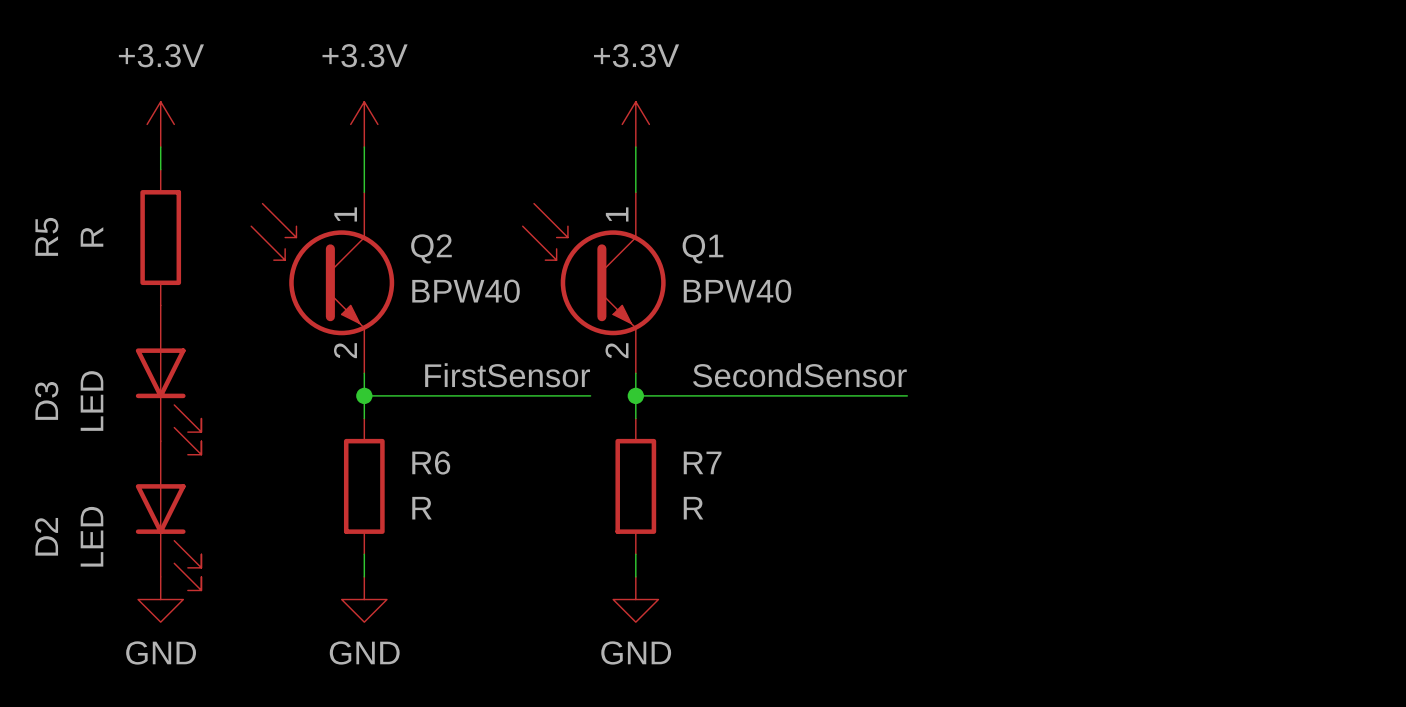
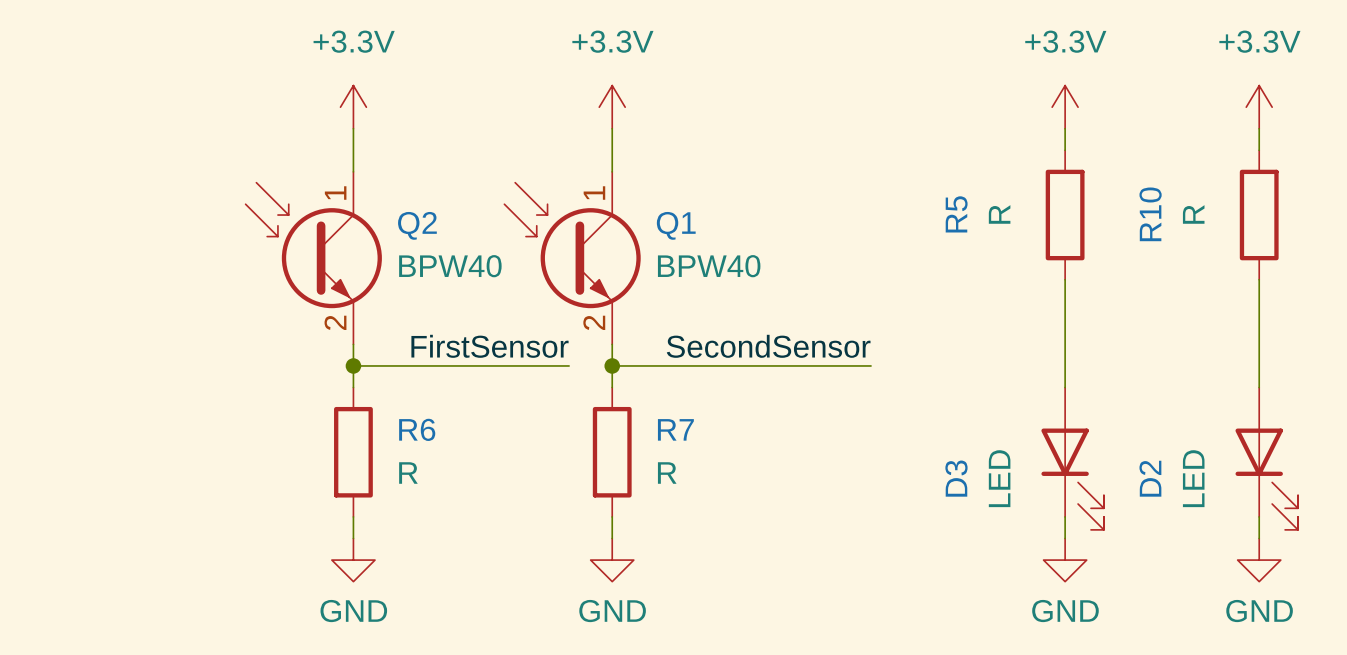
power symbol: +3.3V (160, 124) -> none
power symbol: none -> +3.3V (1065, 107)
power symbol: none -> +3.3V (1259, 107)
wire: (160, 147) (160, 169) -> none
wire: none -> (1065, 128) (1065, 150)
wire: none -> (1259, 128) (1259, 150)
R5 position: (160, 237) -> (1065, 215)
R10: none -> R (1259, 215)
wire: none -> (1065, 279) (1065, 387)
wire: none -> (1259, 279) (1259, 387)
D3 position: (168, 380) -> (1072, 458)
D2 position: (168, 515) -> (1266, 458)
wire: none -> (1065, 516) (1065, 538)
wire: none -> (1259, 516) (1259, 538)
power symbol: GND (160, 599) -> none
power symbol: none -> GND (1065, 560)
power symbol: none -> GND (1259, 560)

